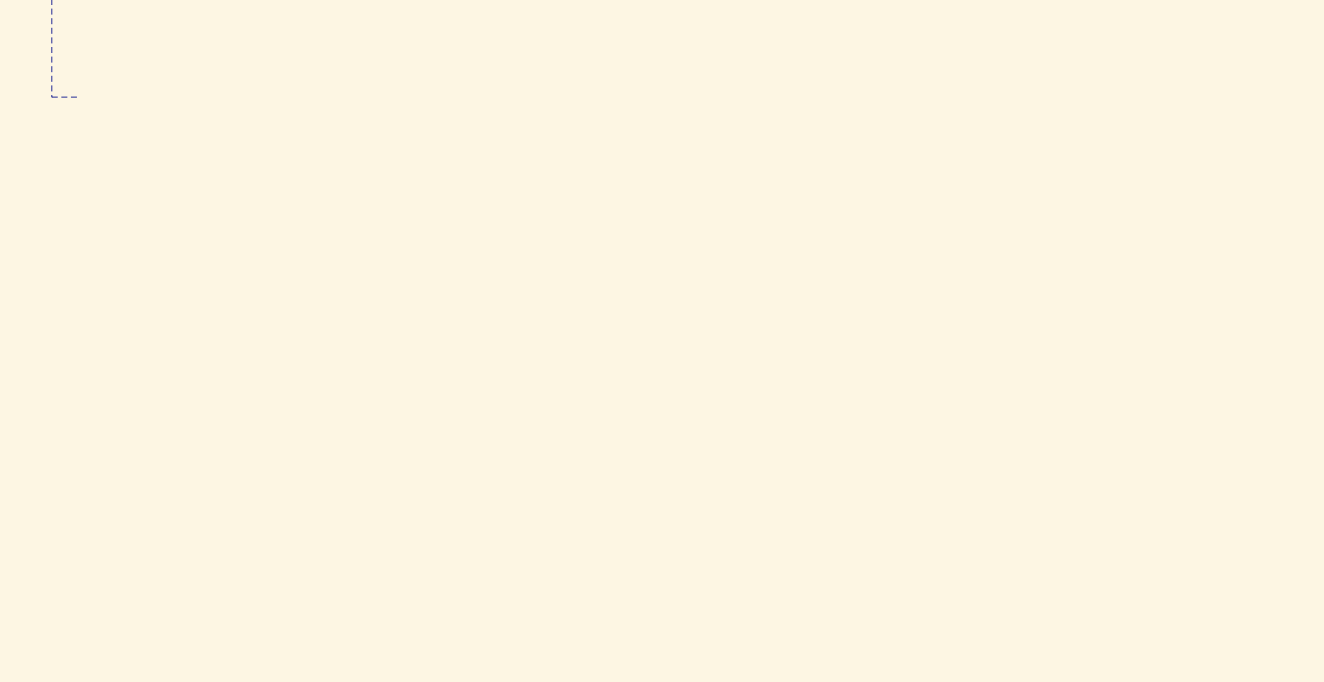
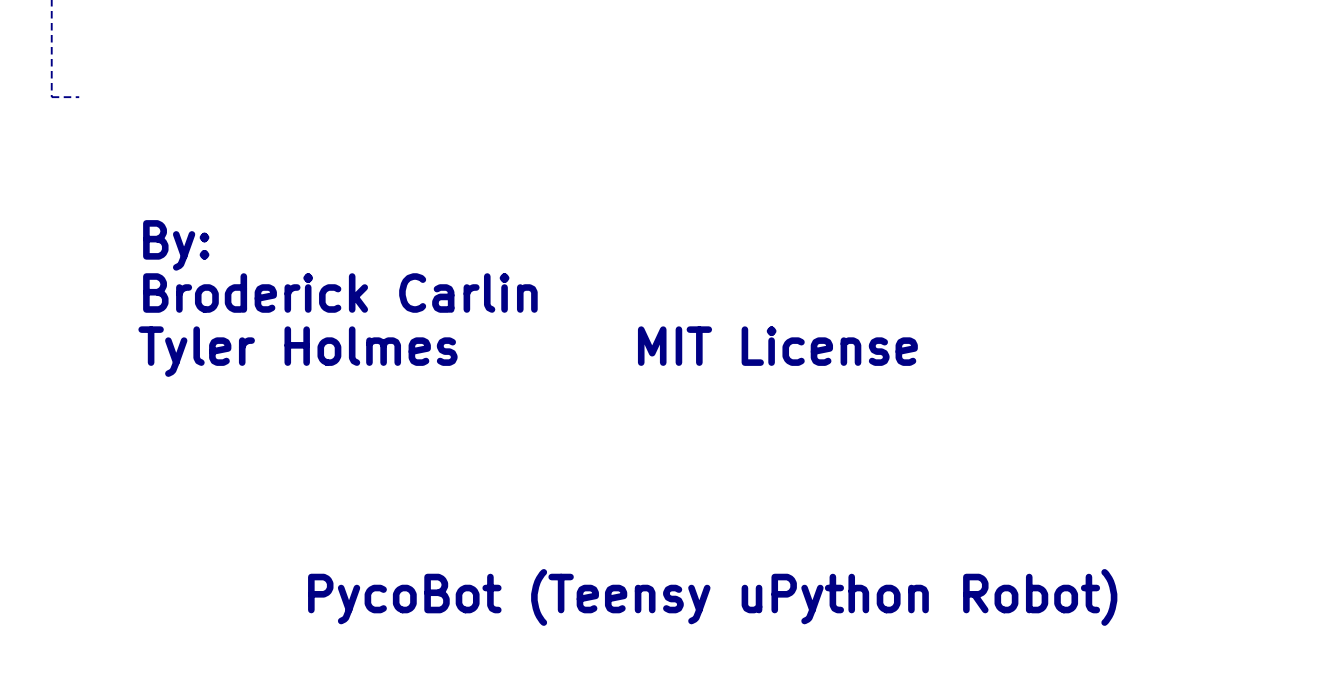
text: none -> By: (176, 245)
text: none -> Broderick Carlin (340, 293)
text: none -> MIT License (777, 346)
text: none -> Tyler Holmes (297, 351)
text: none -> PycoBot (Teensy uPython Robot) (712, 597)

